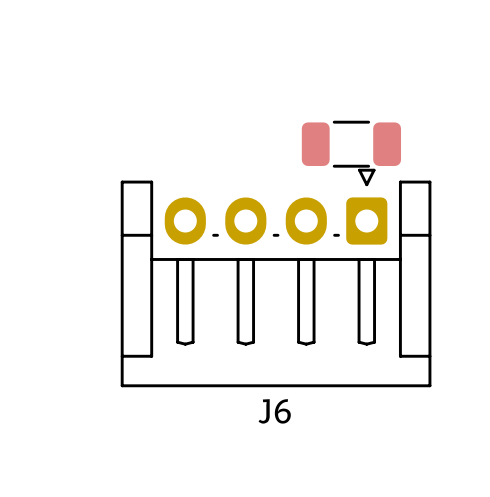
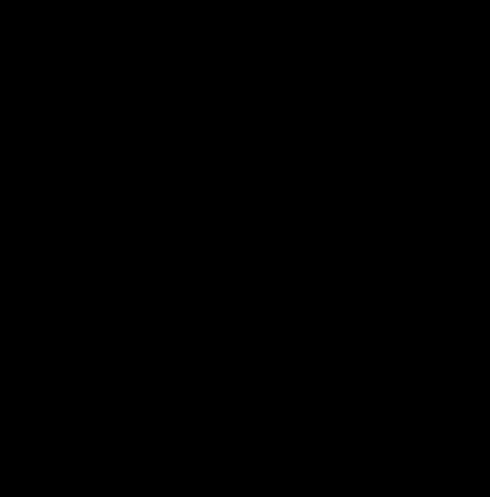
part: (351, 144) -> none
J6: (276, 277) -> none

